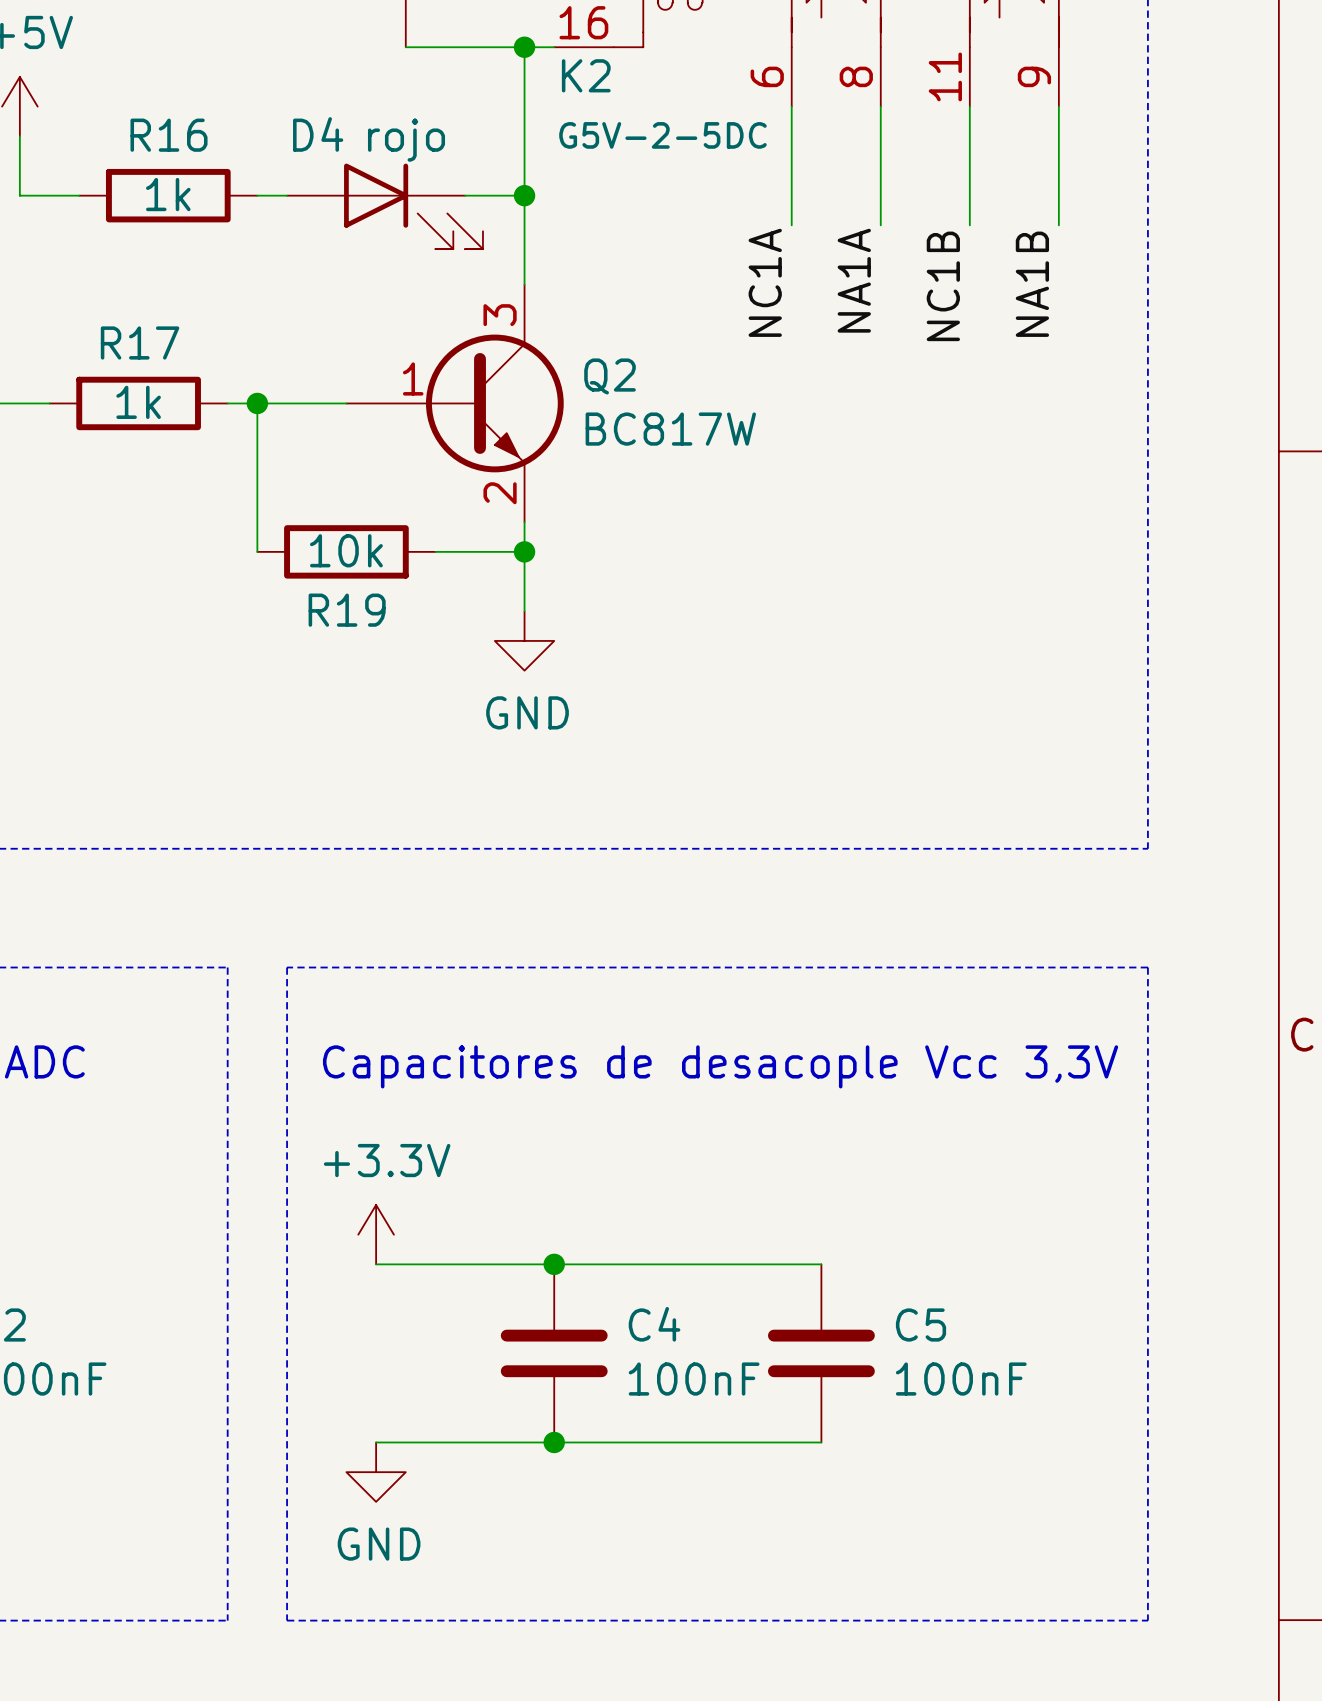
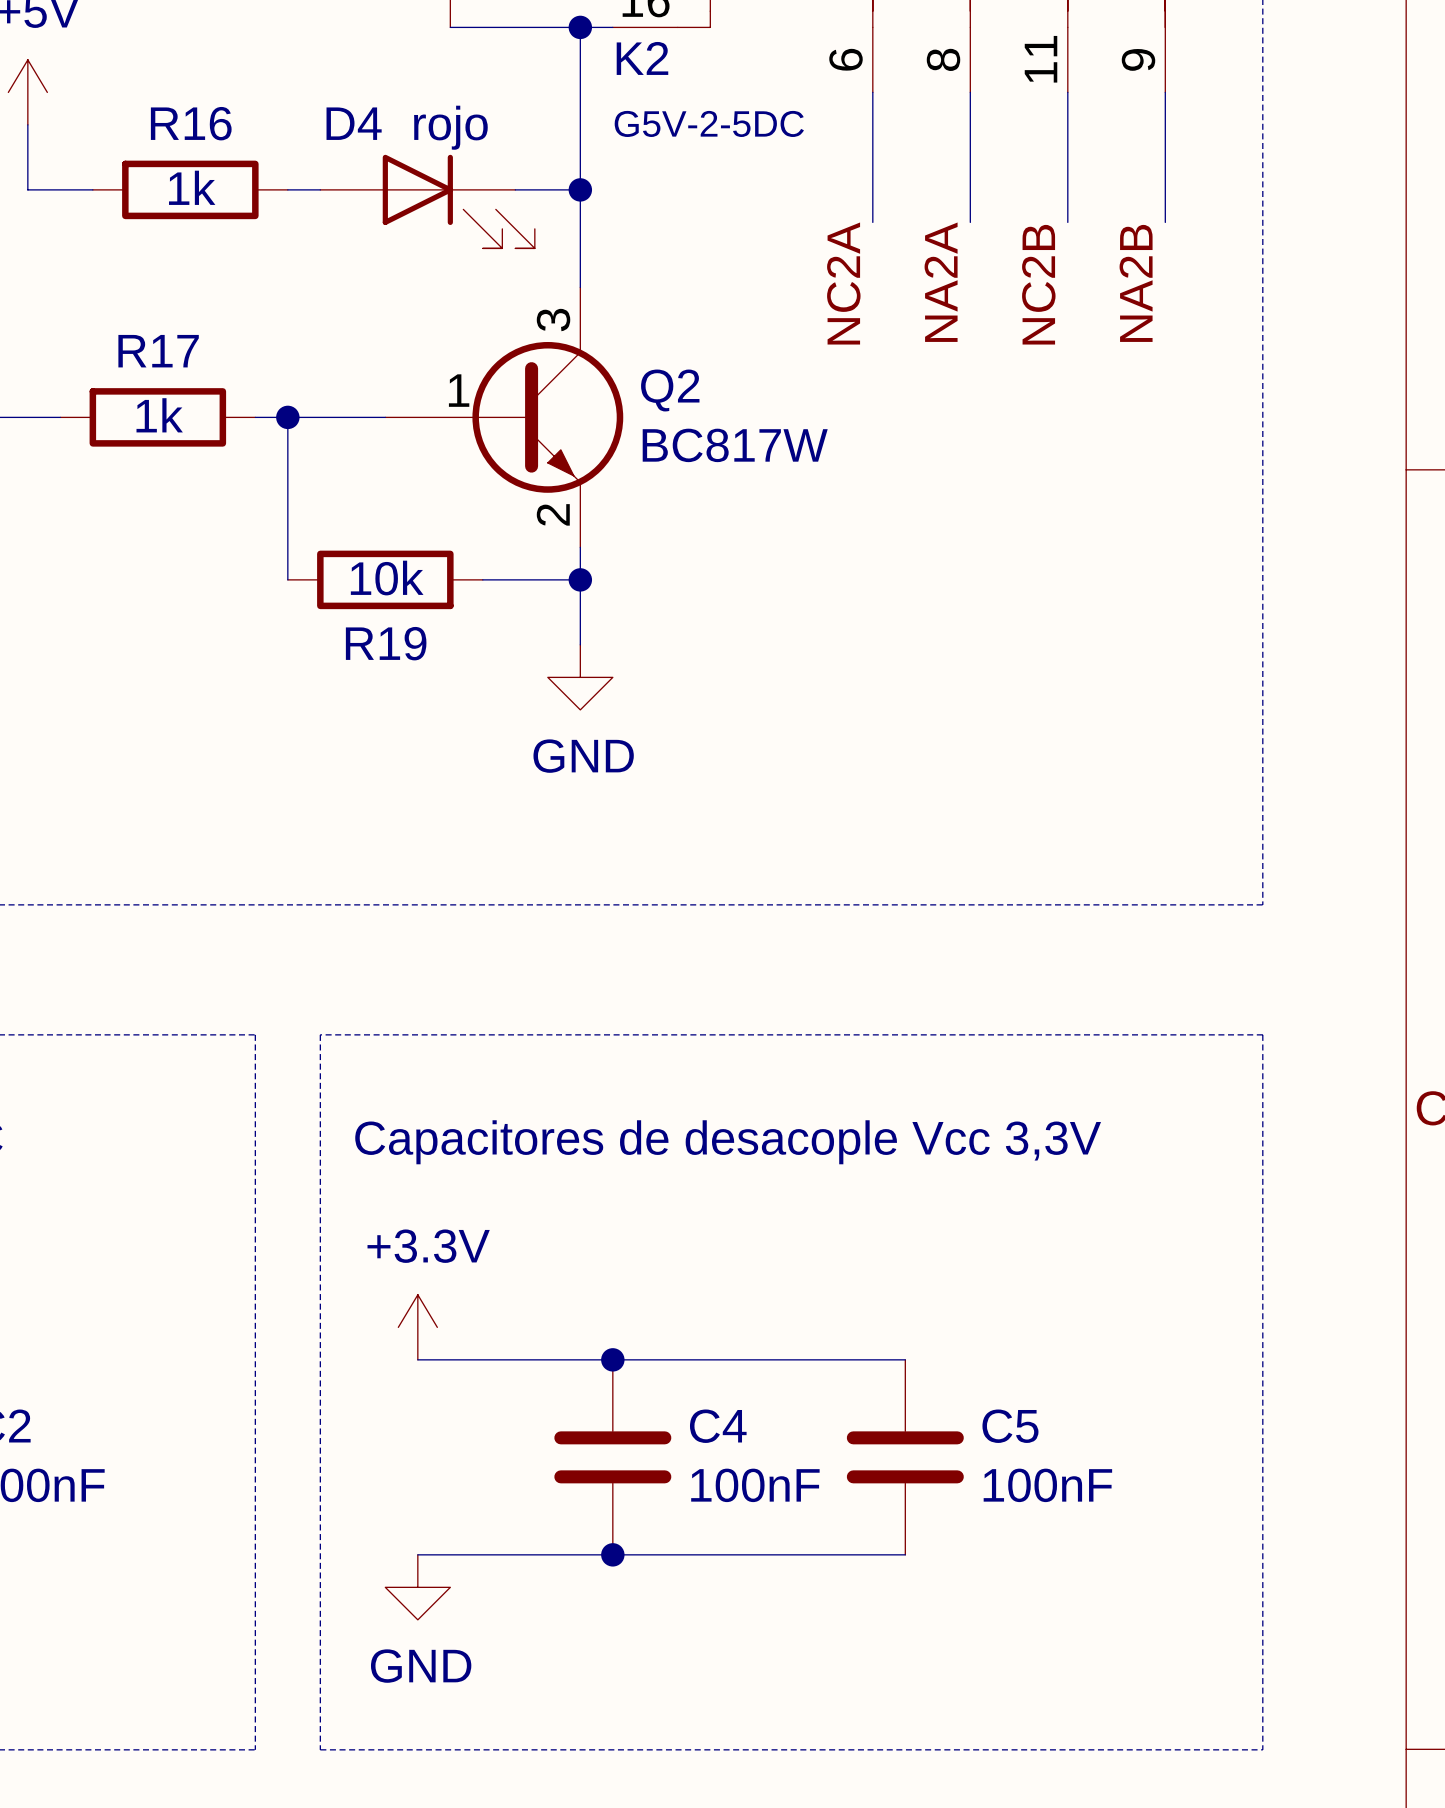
label: NA1A (854, 280) -> NA2A (941, 282)
label: NC1A (765, 282) -> NC2A (843, 283)
label: NA1B (1032, 284) -> NA2B (1136, 283)
label: NC1B (943, 286) -> NC2B (1038, 284)

